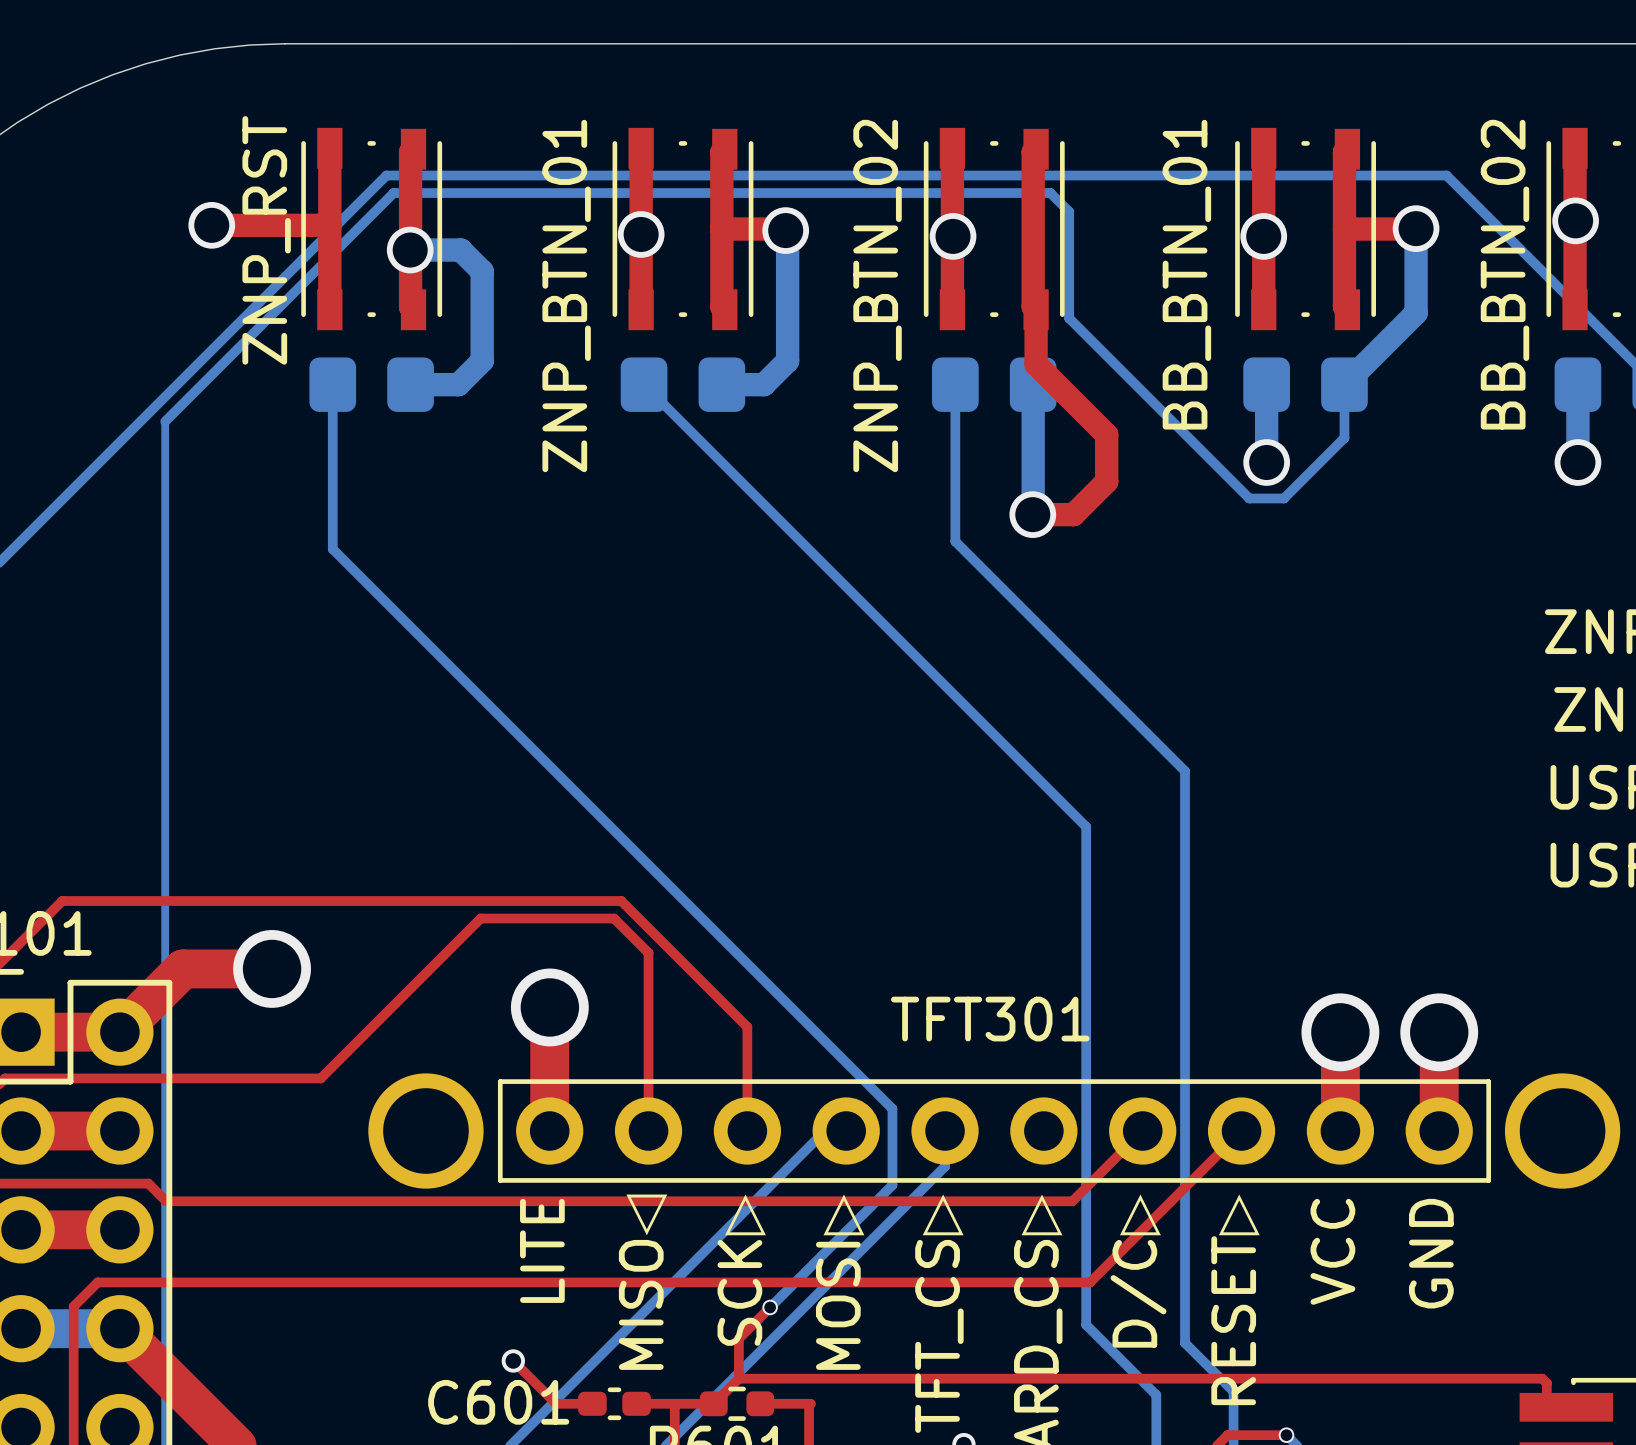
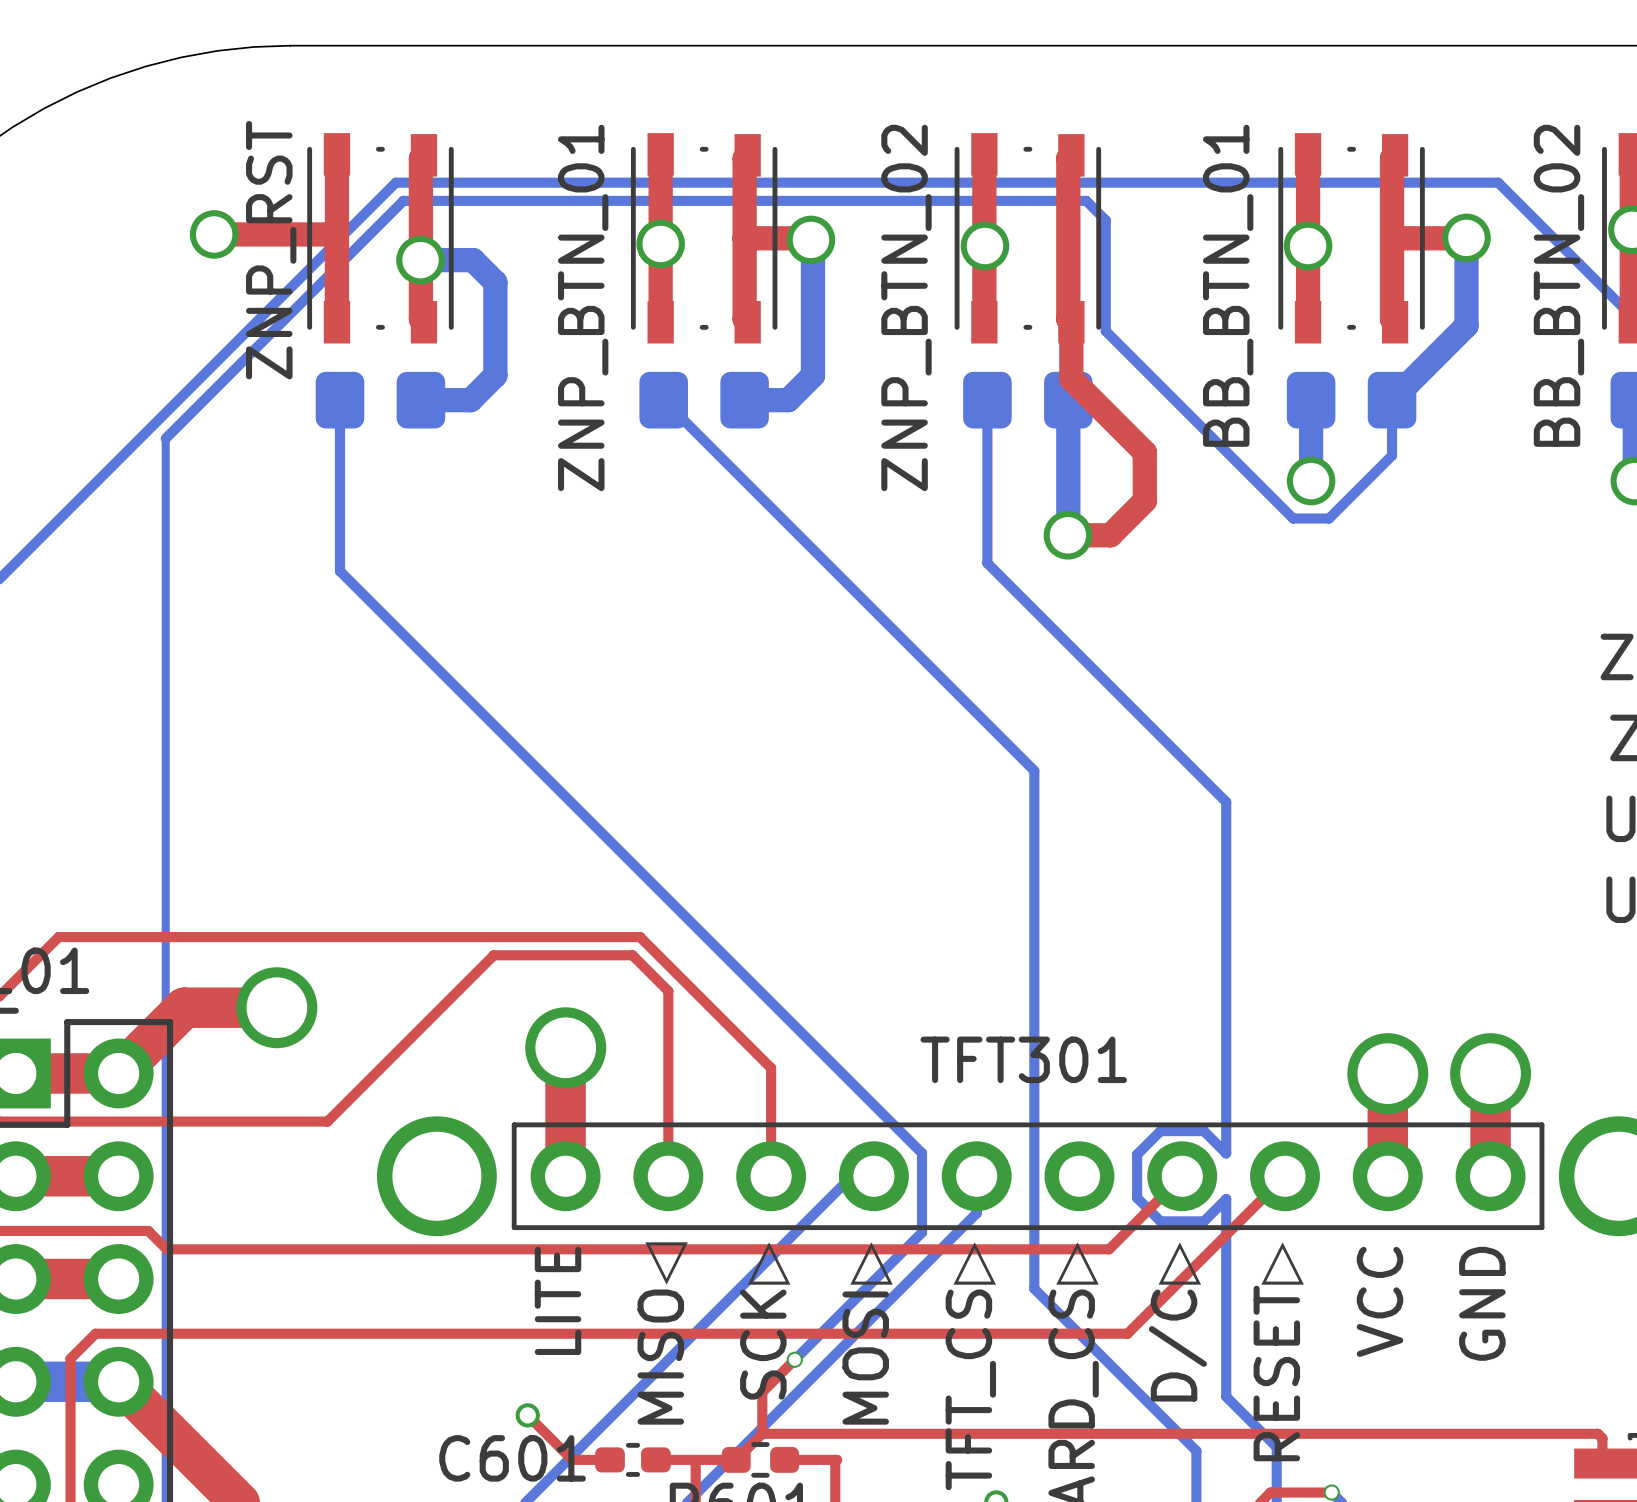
bottom track: (1000, 741) (1086, 826) (1086, 1324) -> (1034, 770) (1034, 1288) (1123, 1377)
bottom track: (1185, 1109) (1185, 1152) -> (1226, 1153) (1203, 1131) (1160, 1131) (1137, 1154) (1137, 1197) (1160, 1221) (1203, 1221) (1226, 1199)

